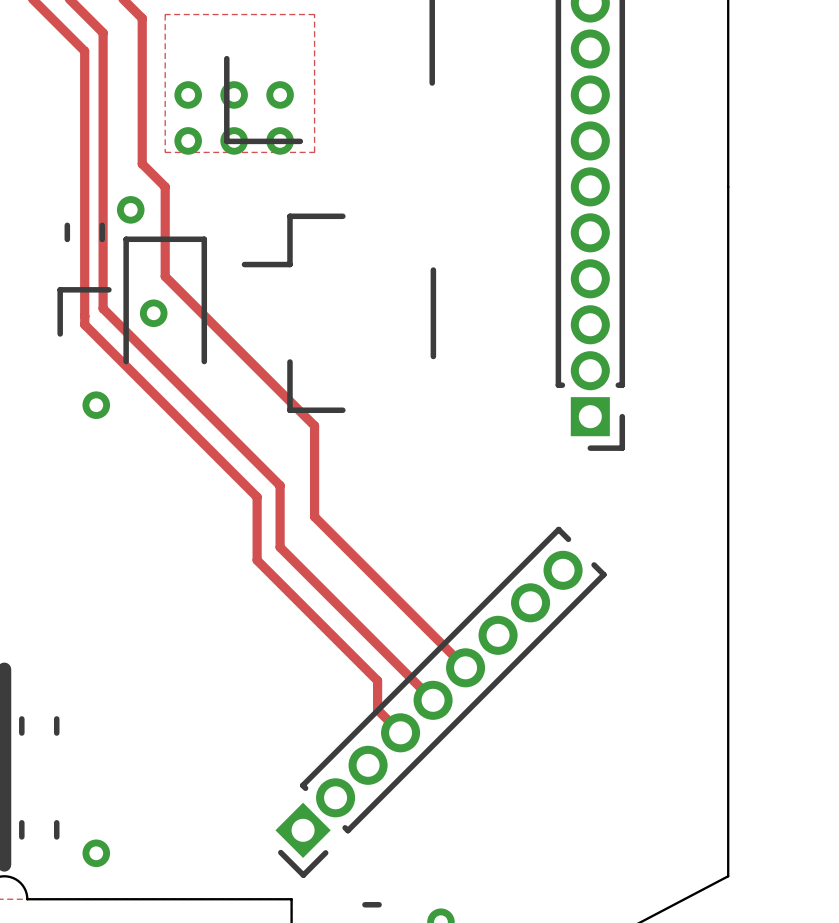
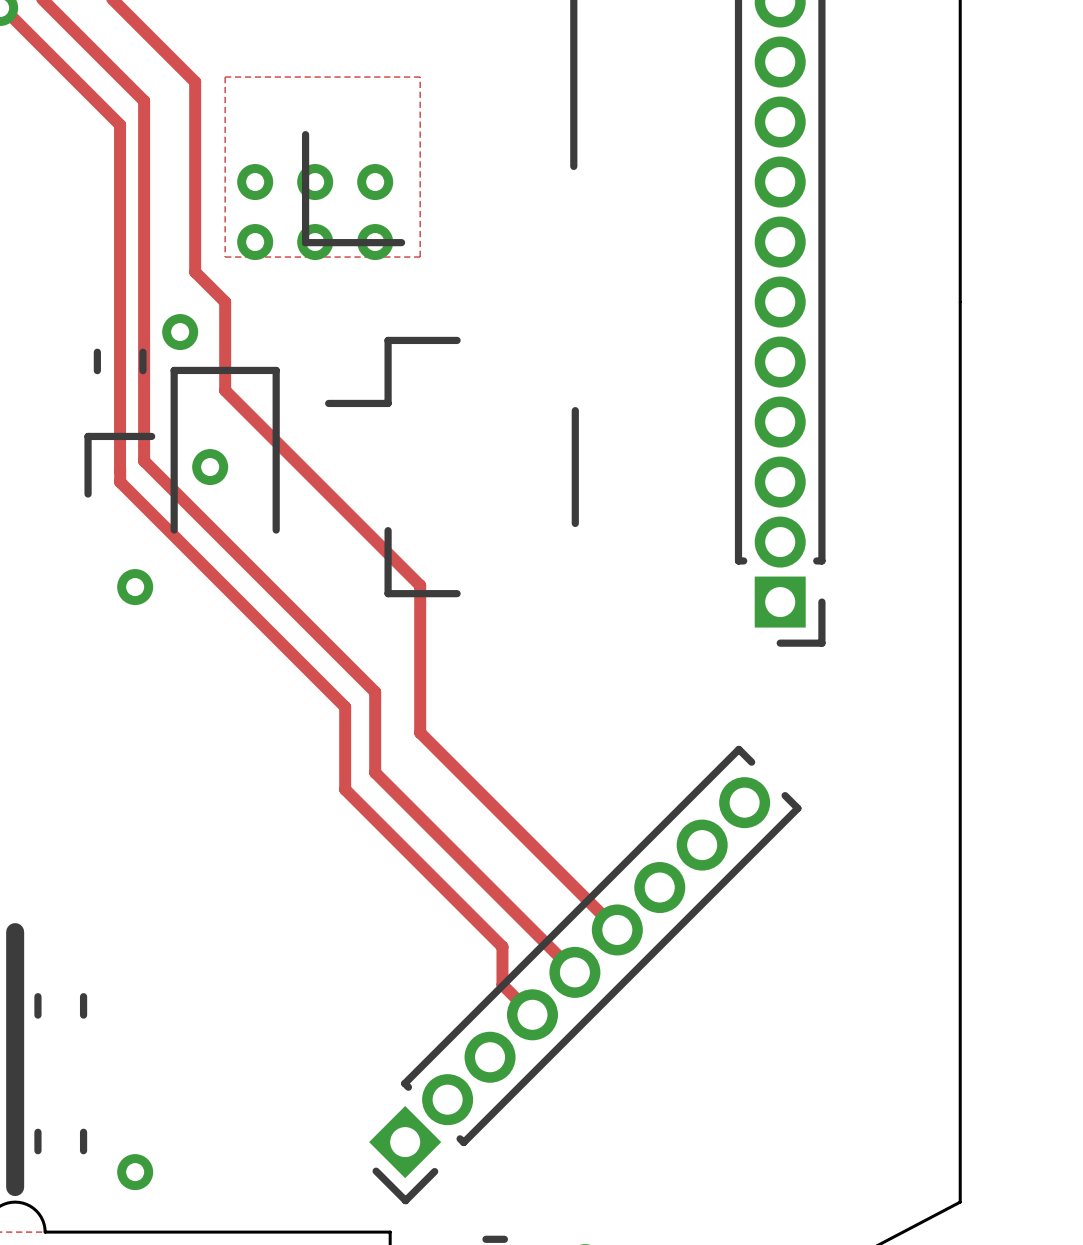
track: (165, 254) (165, 276) (314, 425) -> (225, 390) (420, 585) (420, 614)

